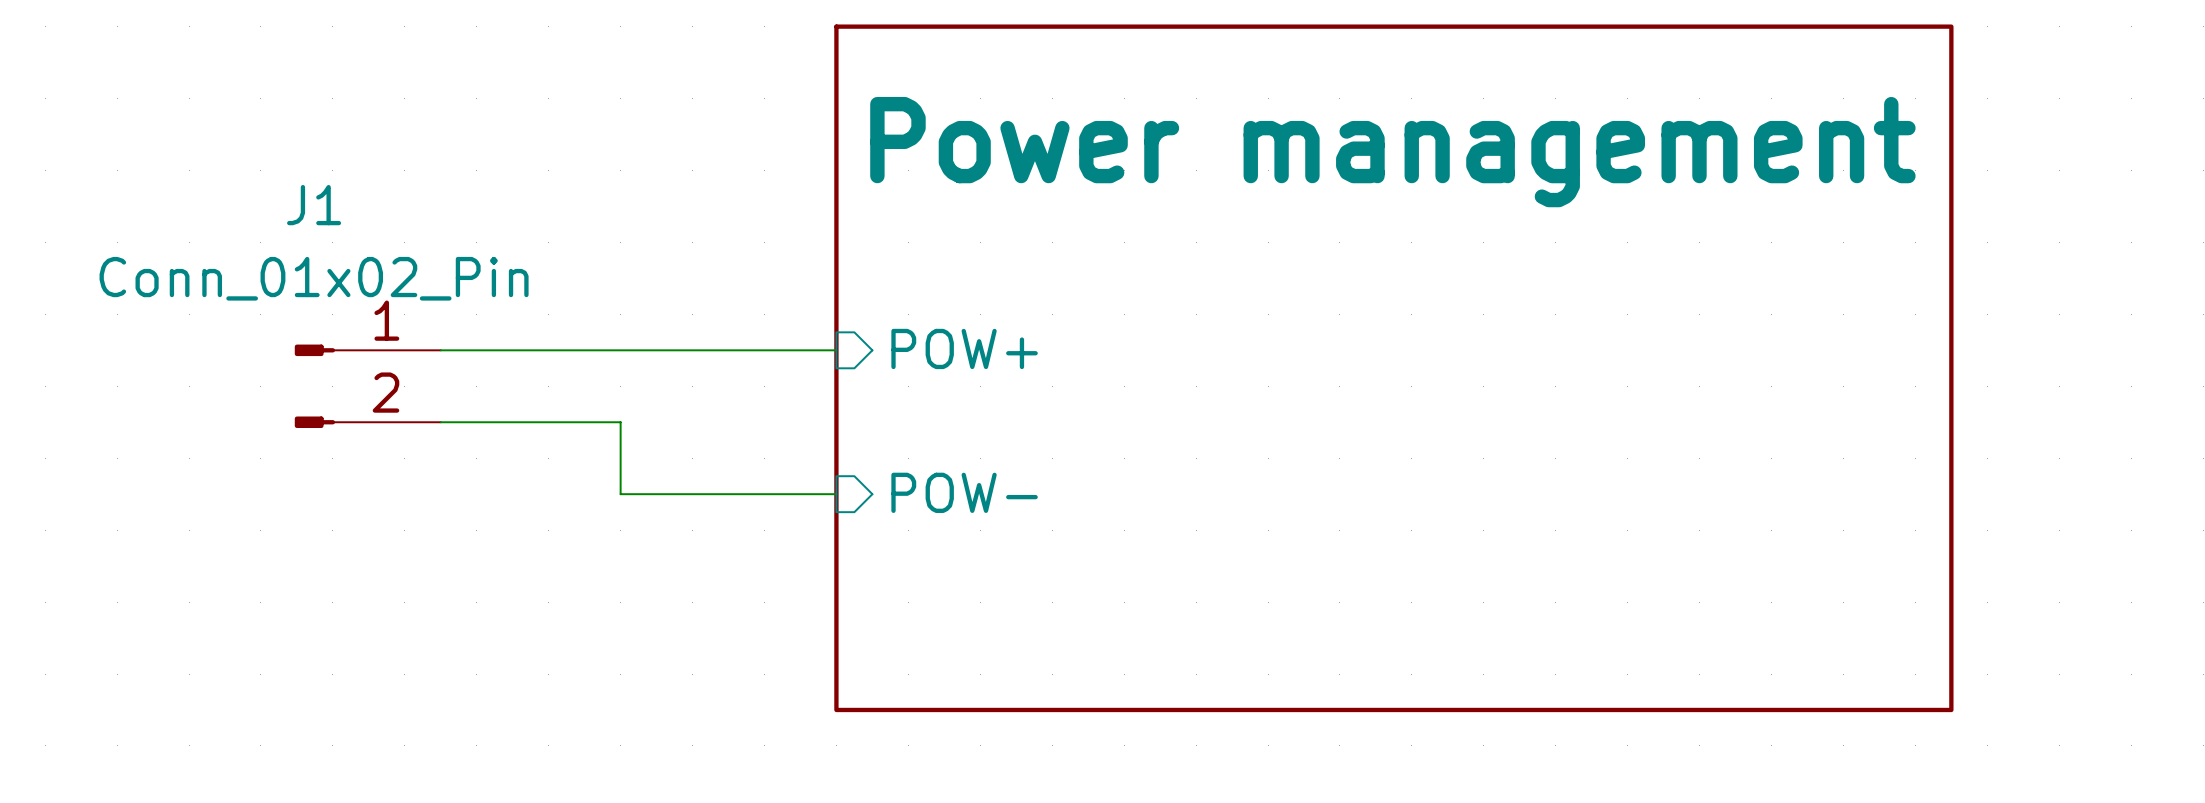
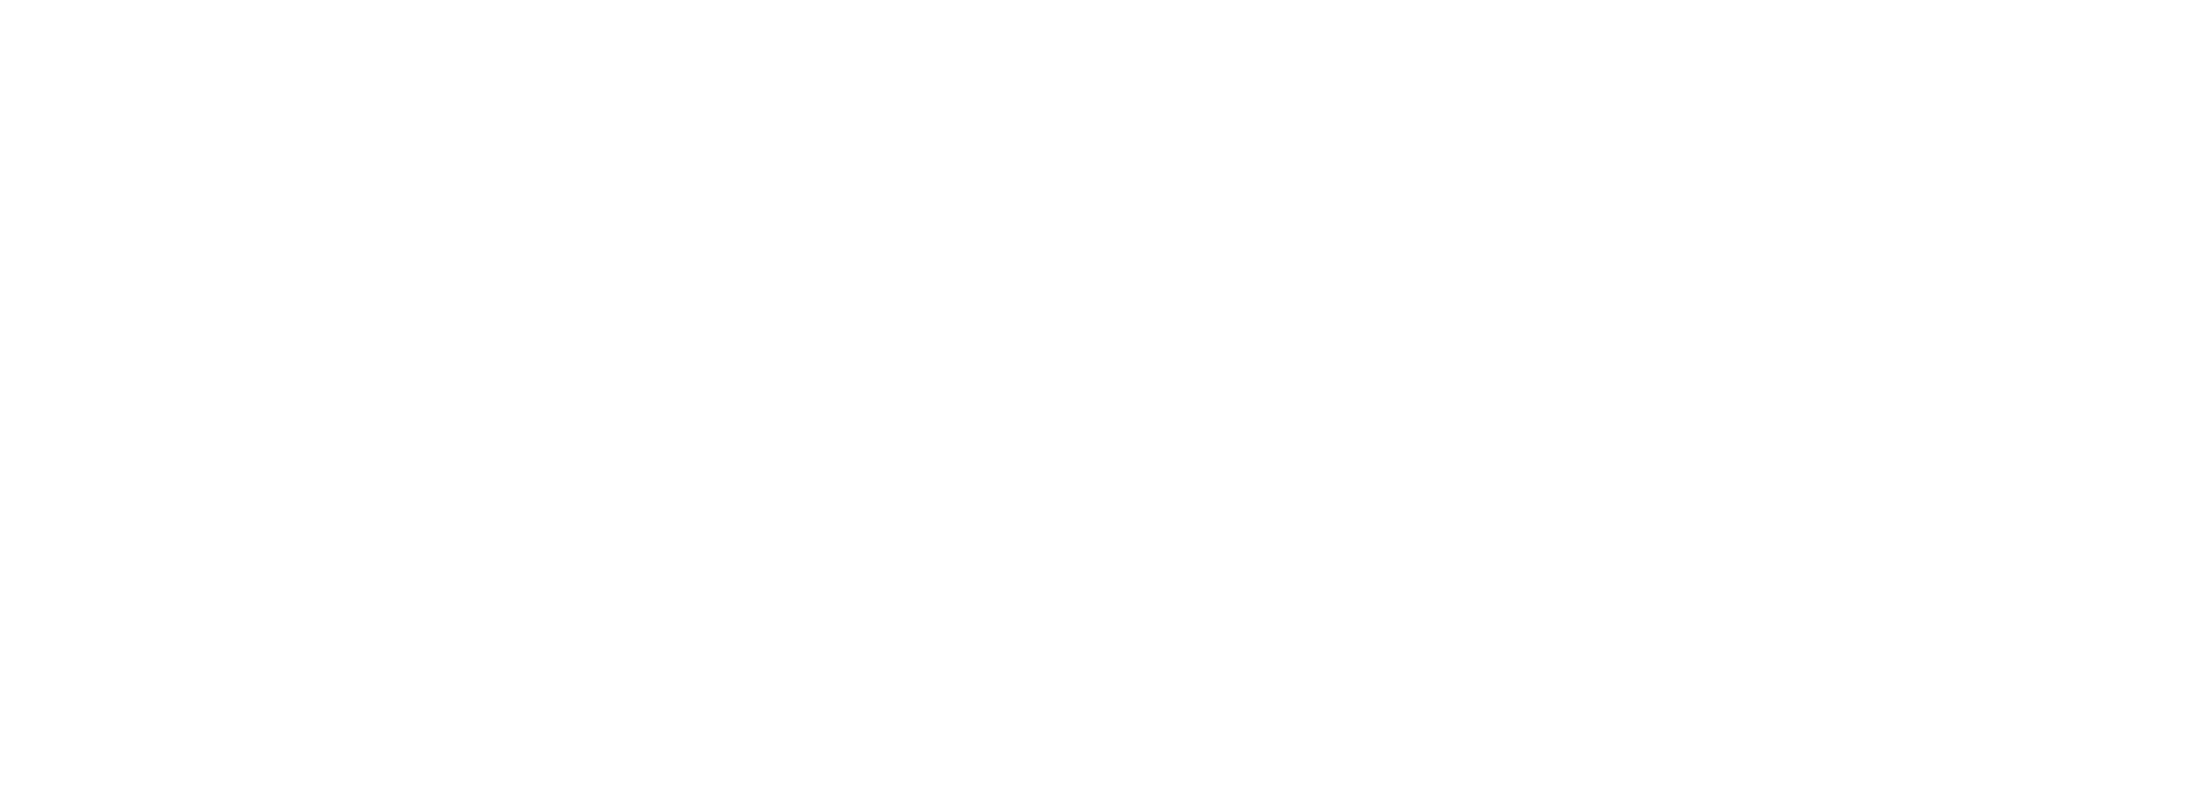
sheet pin: POW+ (964, 348) -> none
wire: (440, 350) (836, 350) -> none
sheet Power management: (1393, 368) -> none
J1: Conn_01x02_Pin (367, 386) -> none
wire: (440, 422) (620, 422) (620, 494) (836, 494) -> none
sheet pin: POW- (964, 492) -> none

